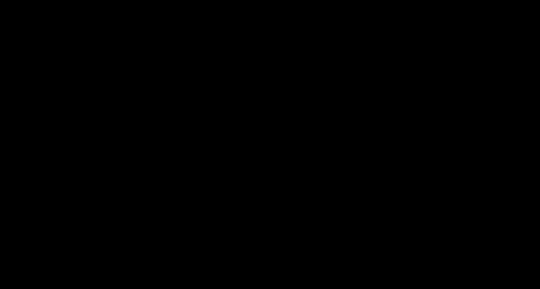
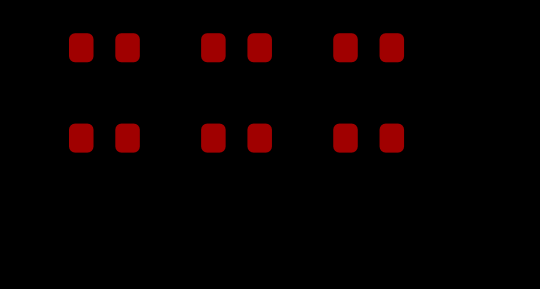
part: none -> (104, 47)
part: none -> (236, 47)
part: none -> (368, 47)
part: none -> (104, 138)
part: none -> (236, 138)
part: none -> (368, 138)

